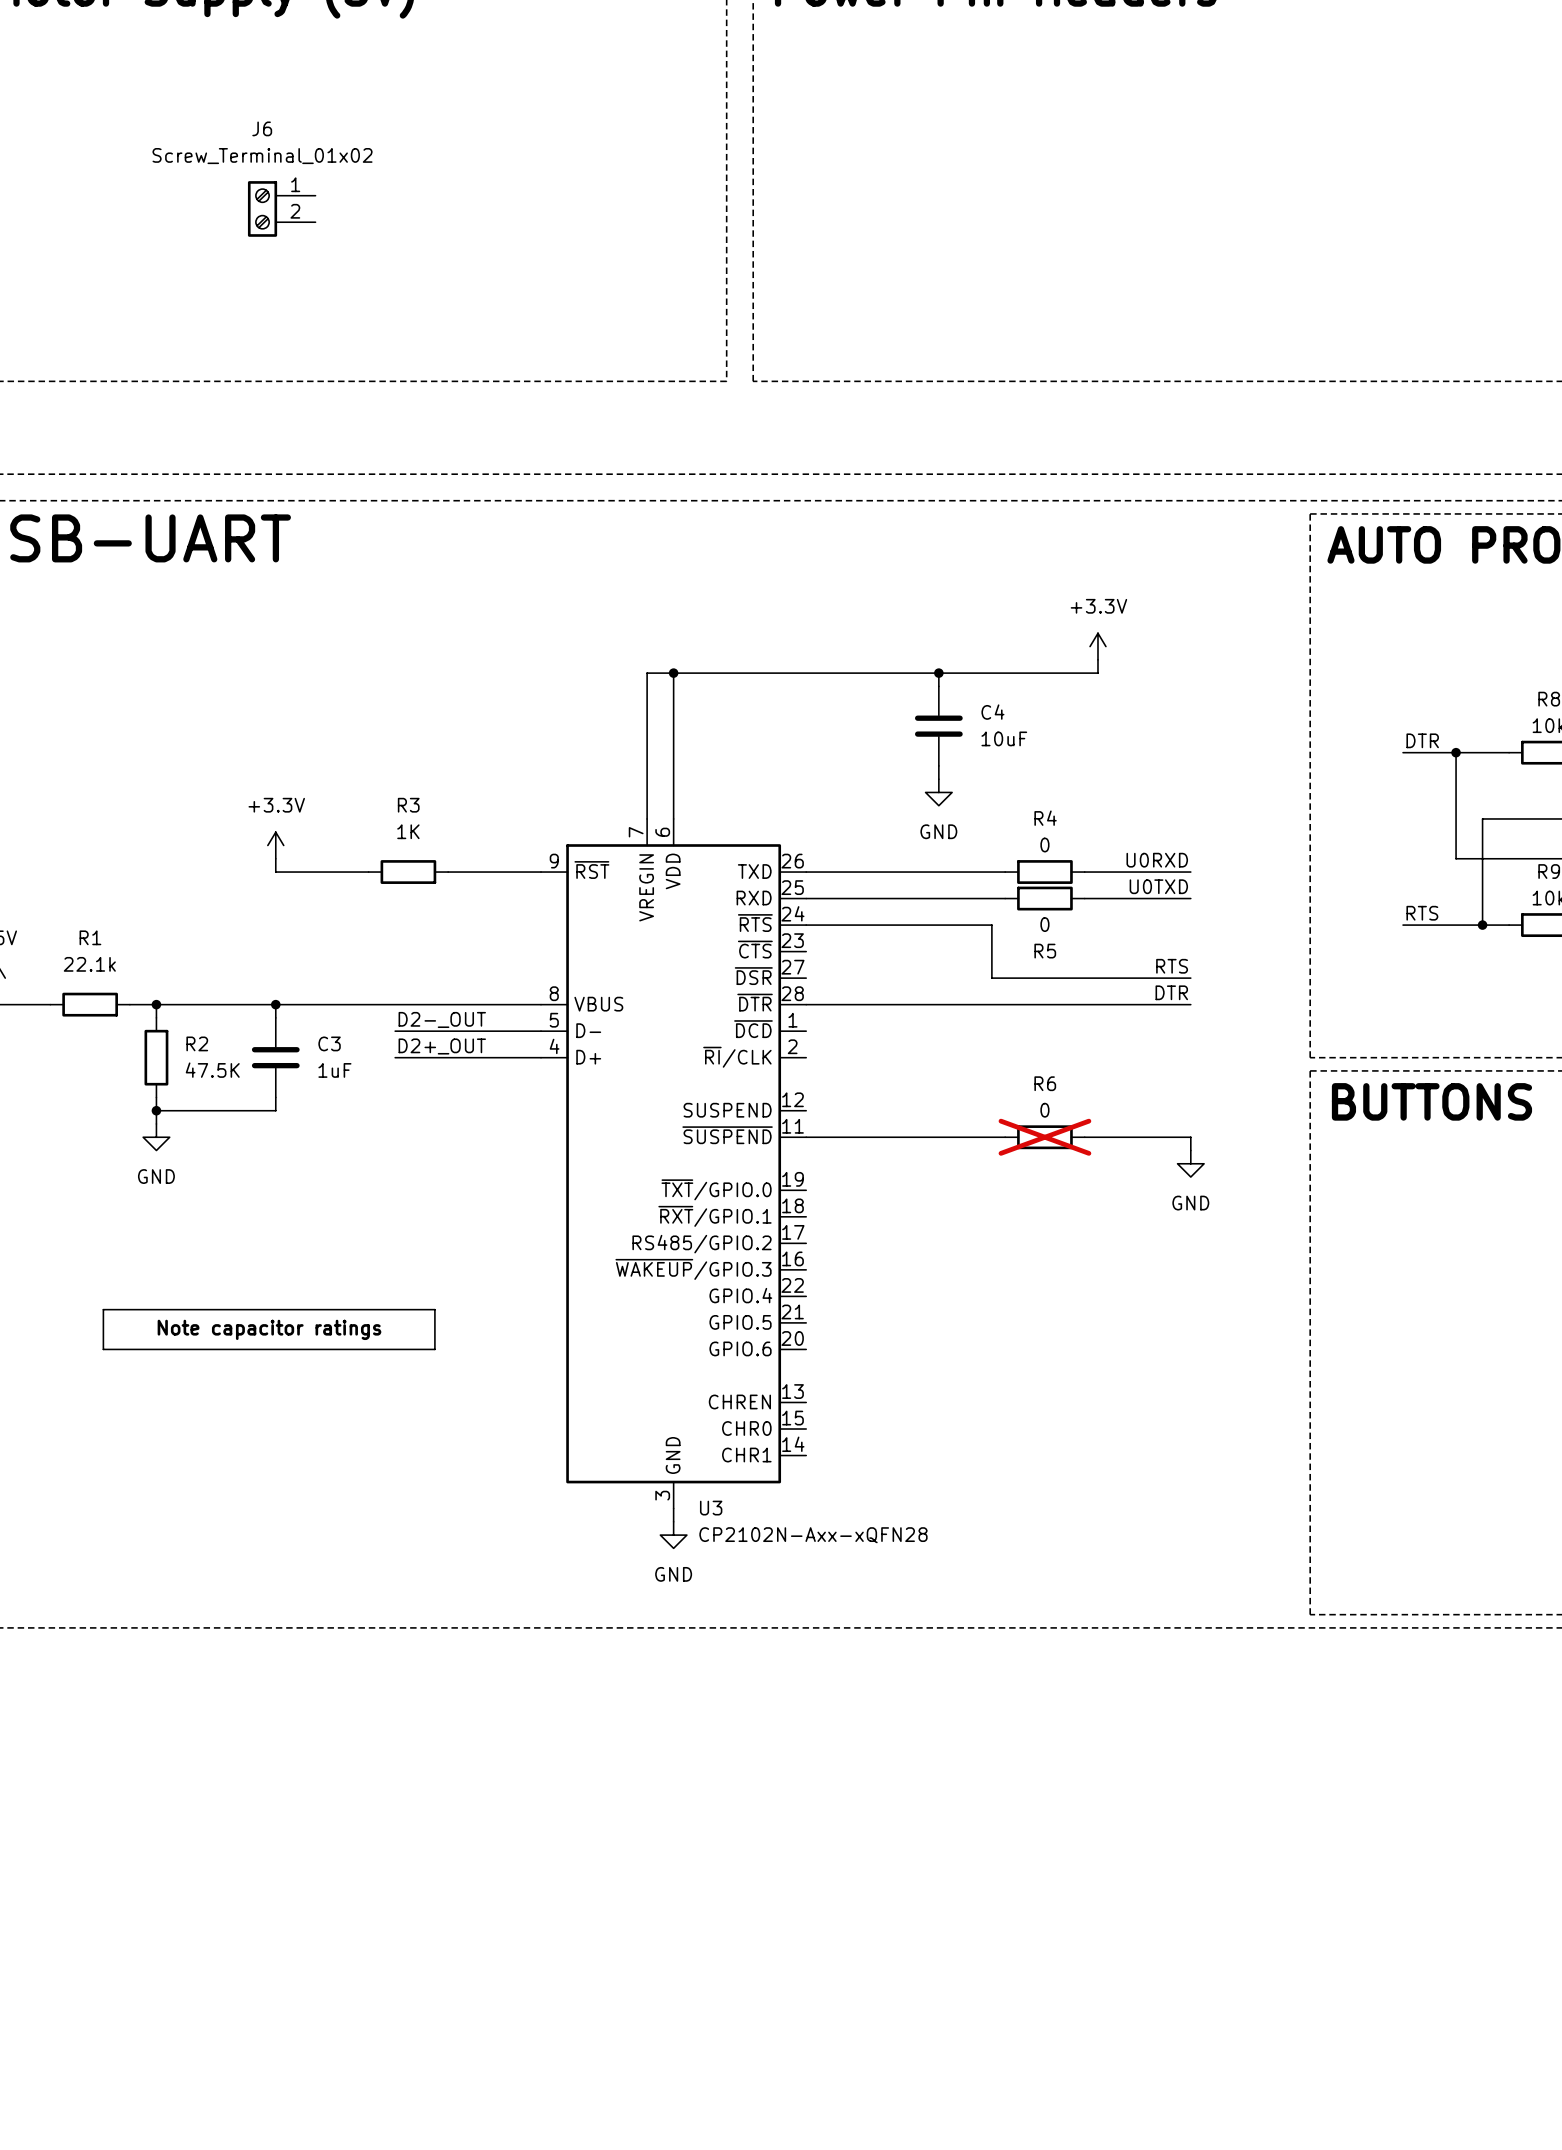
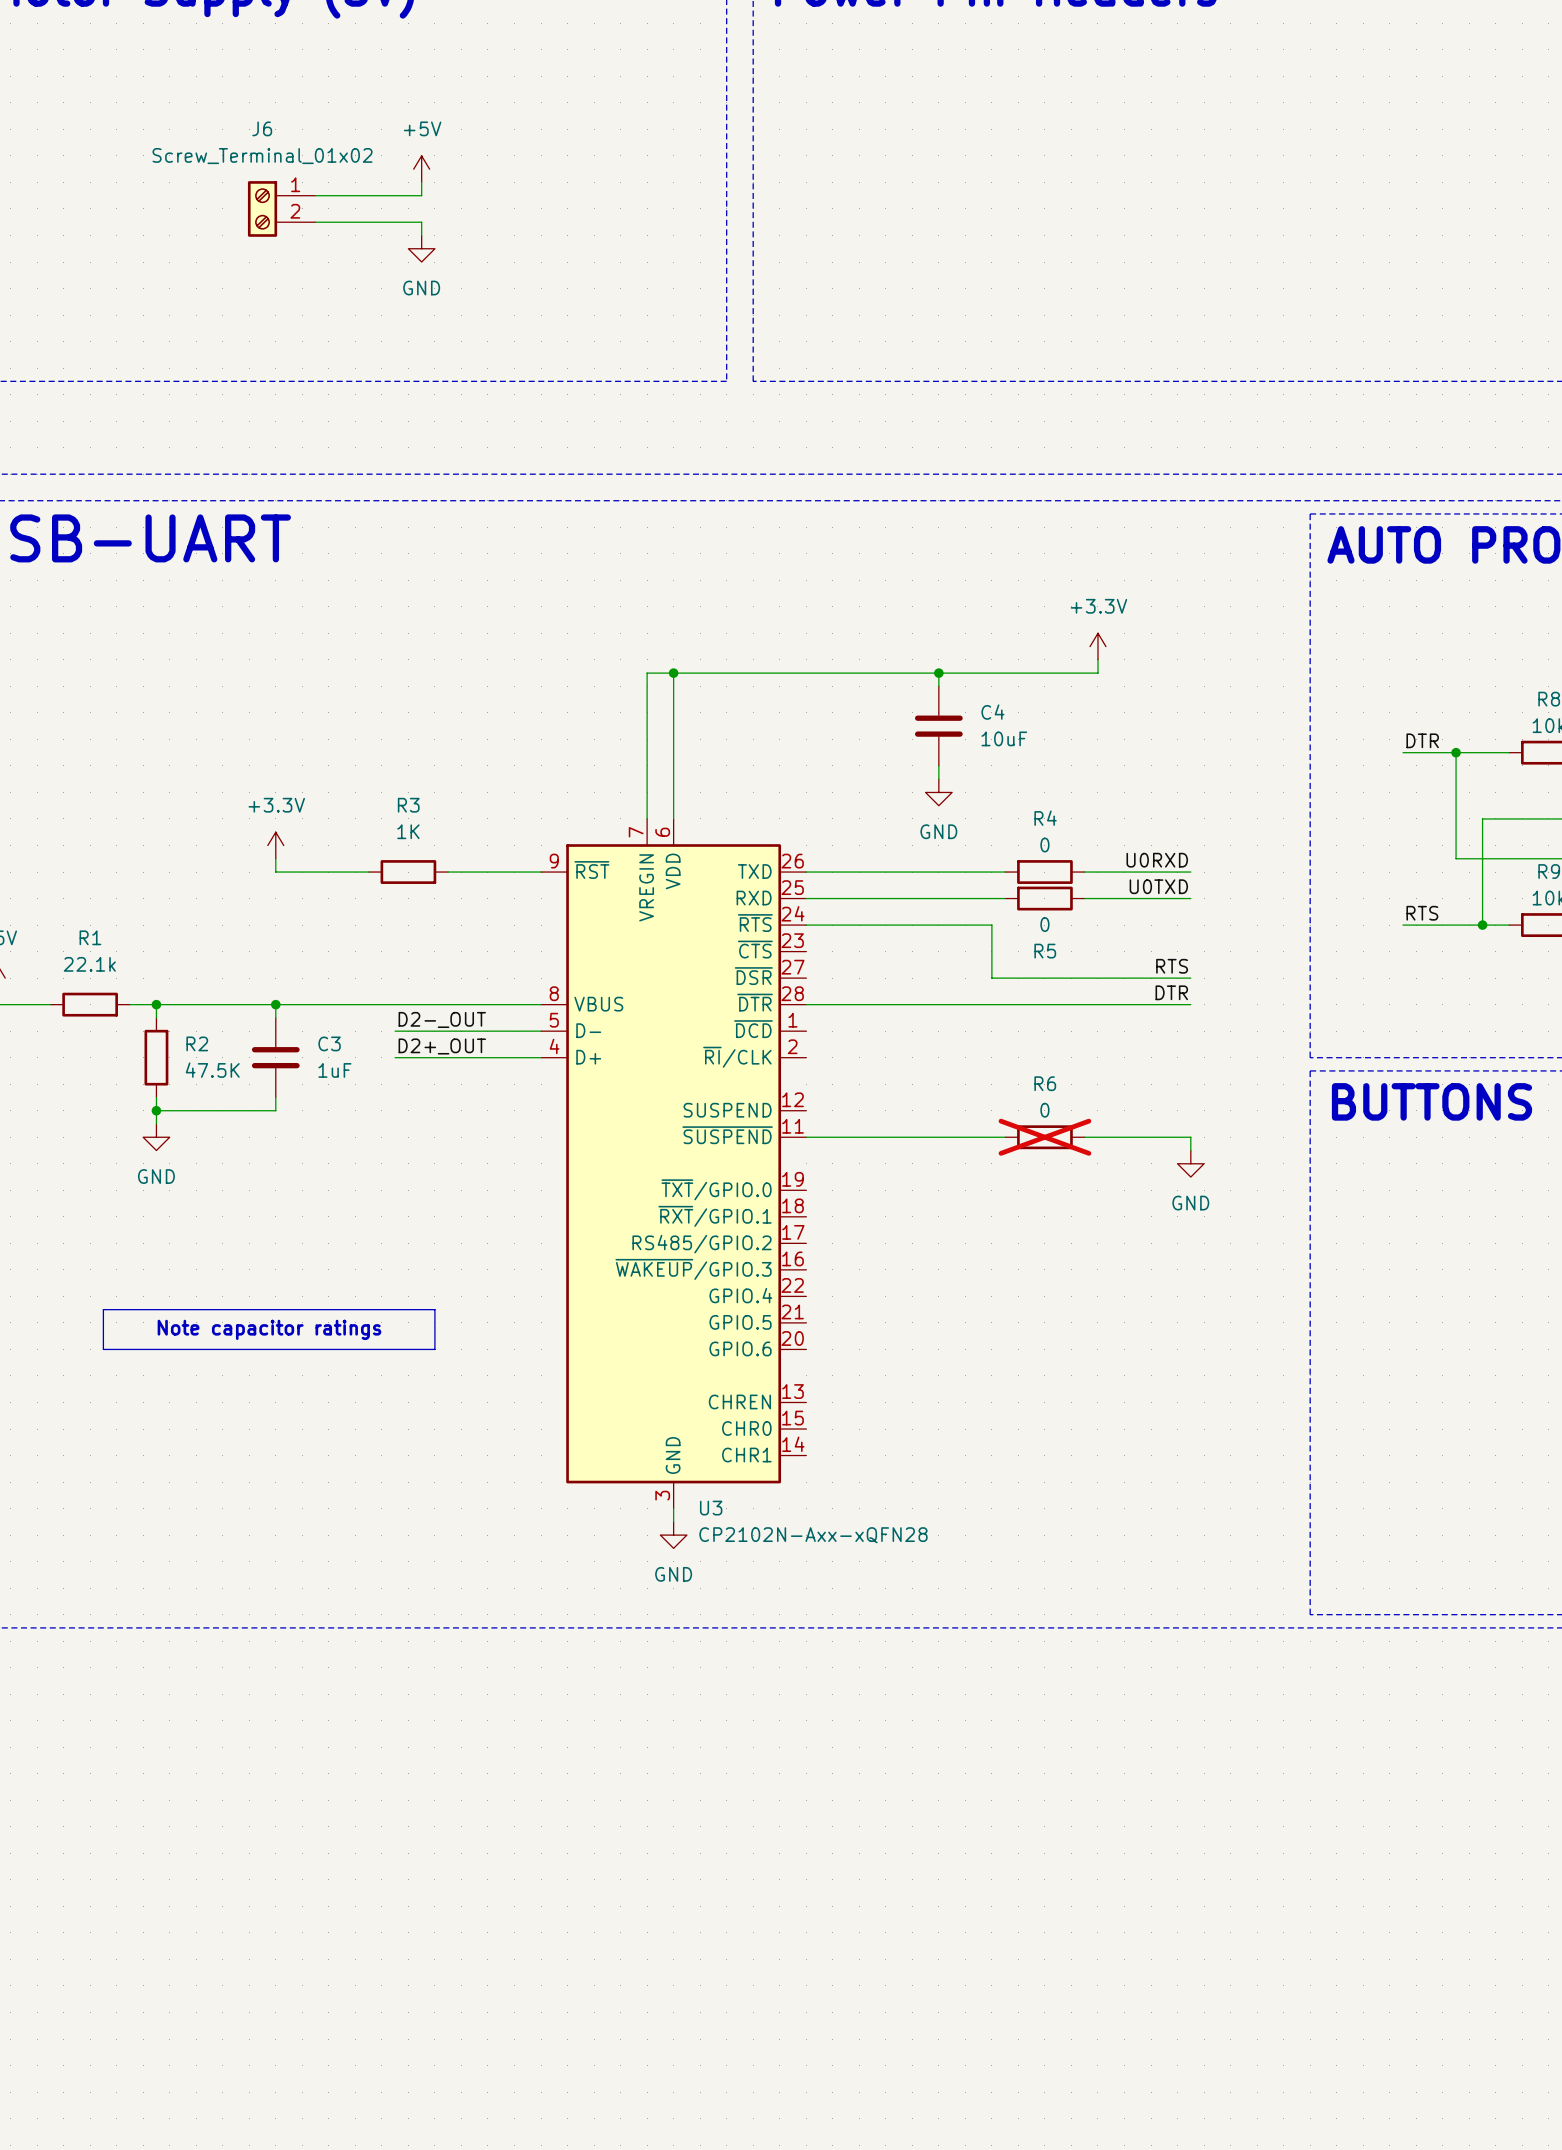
power symbol: none -> +5V (421, 169)
wire: none -> (421, 182) (421, 195) (315, 195)
wire: none -> (315, 222) (421, 222) (421, 235)
power symbol: none -> GND (421, 248)

